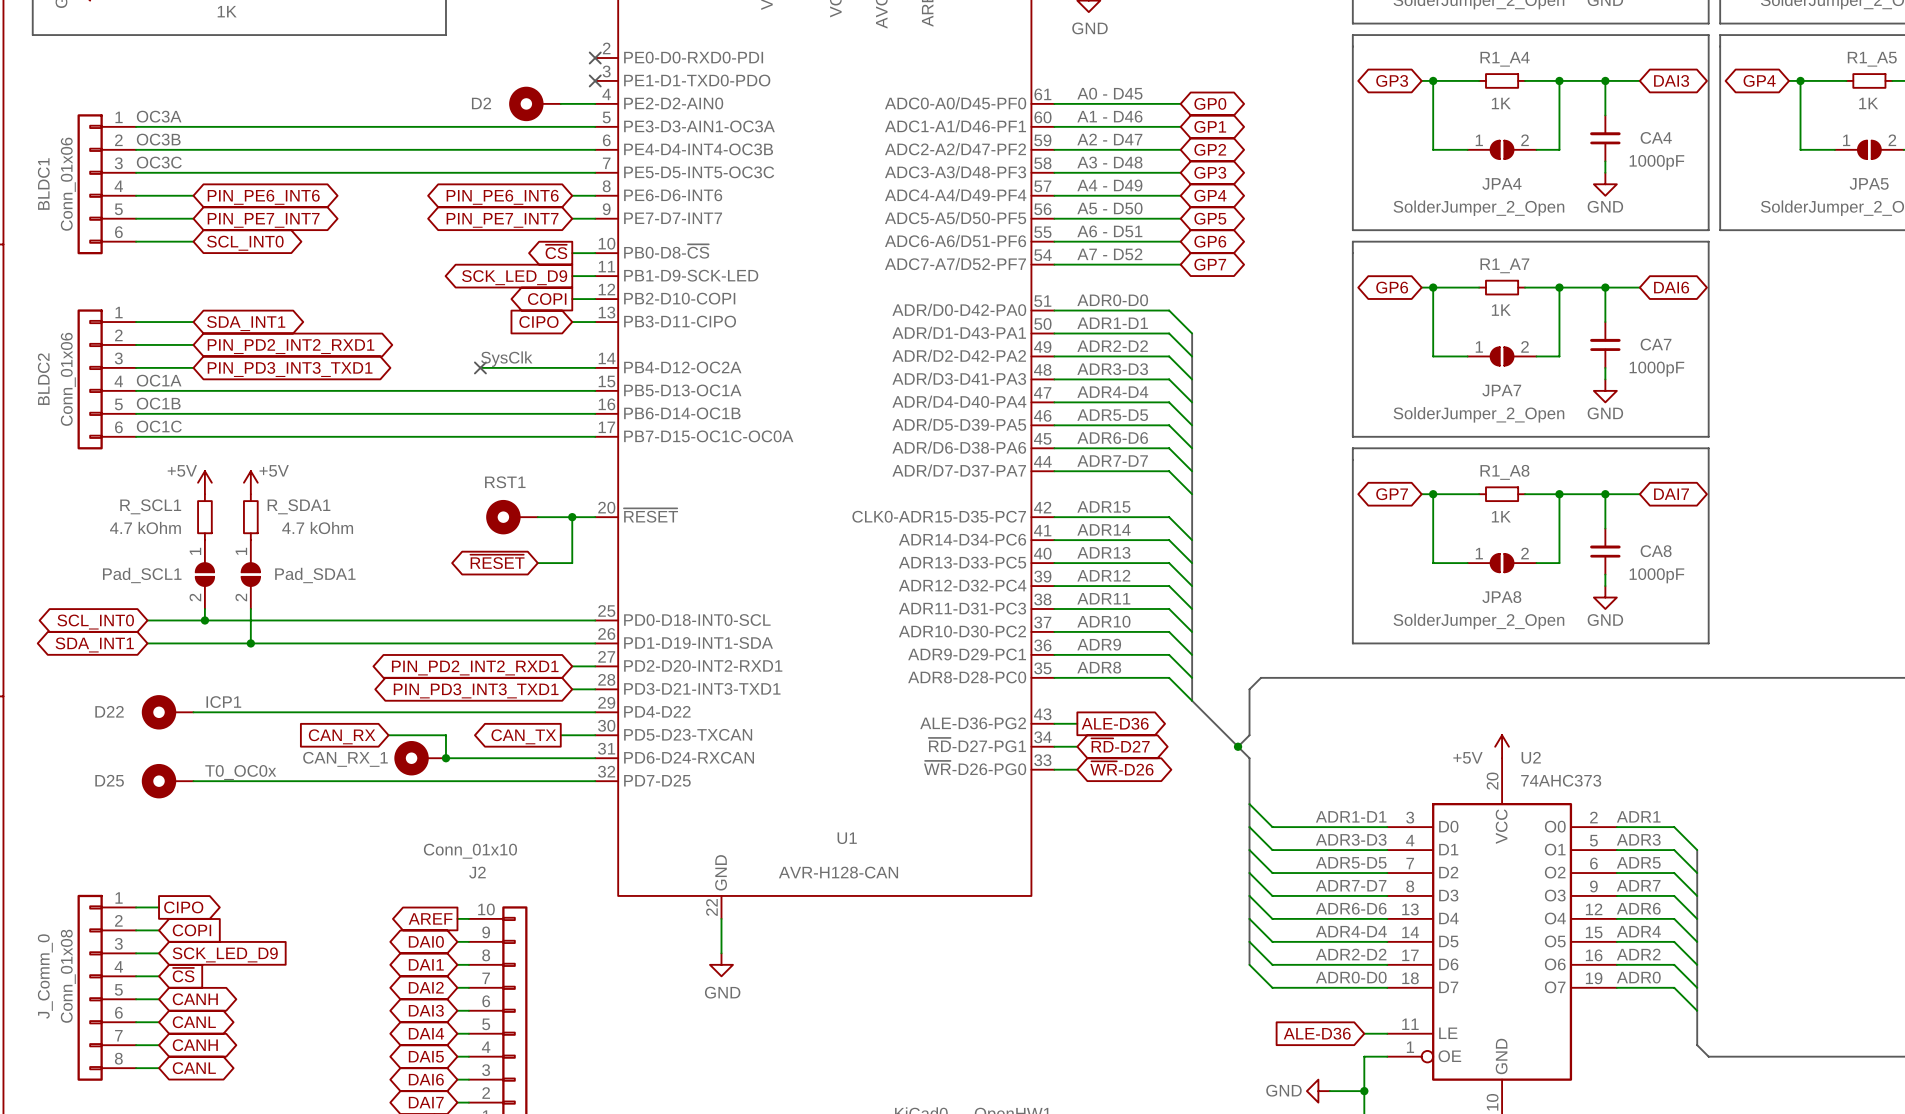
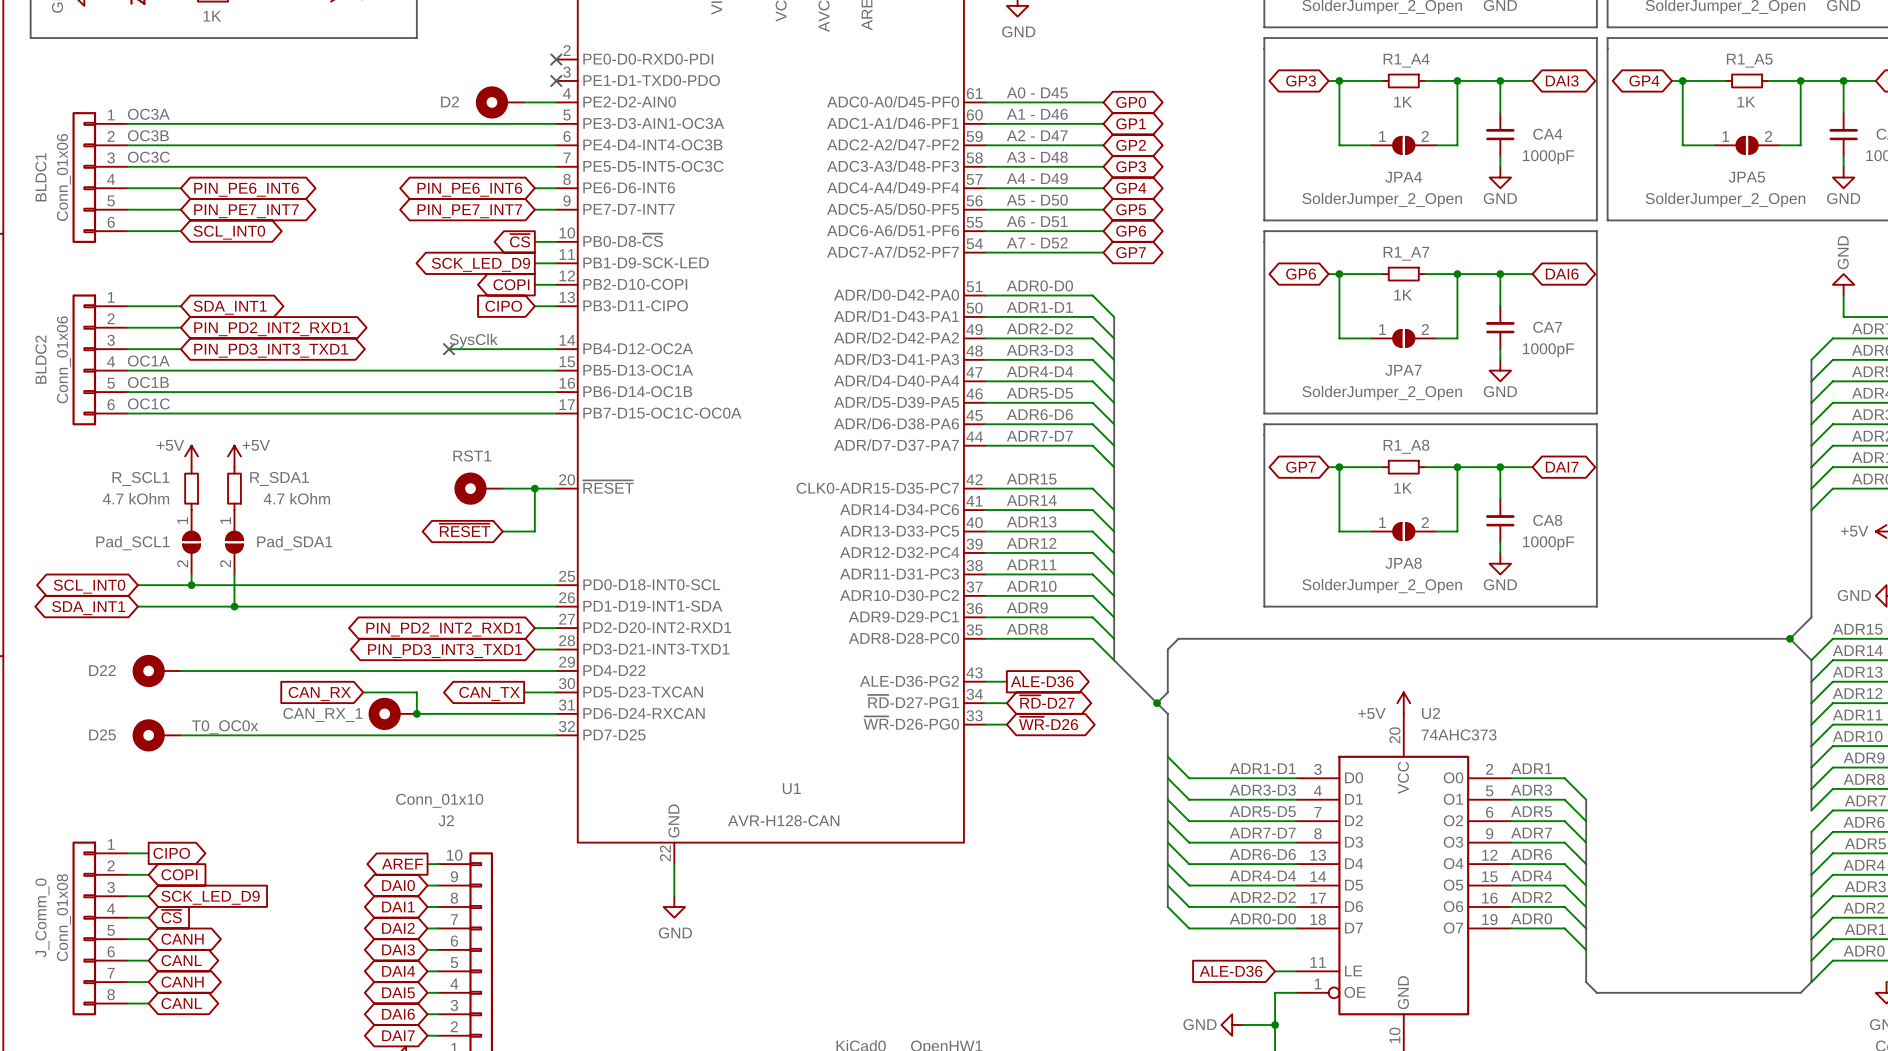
label: ICP1 (223, 702) -> none

